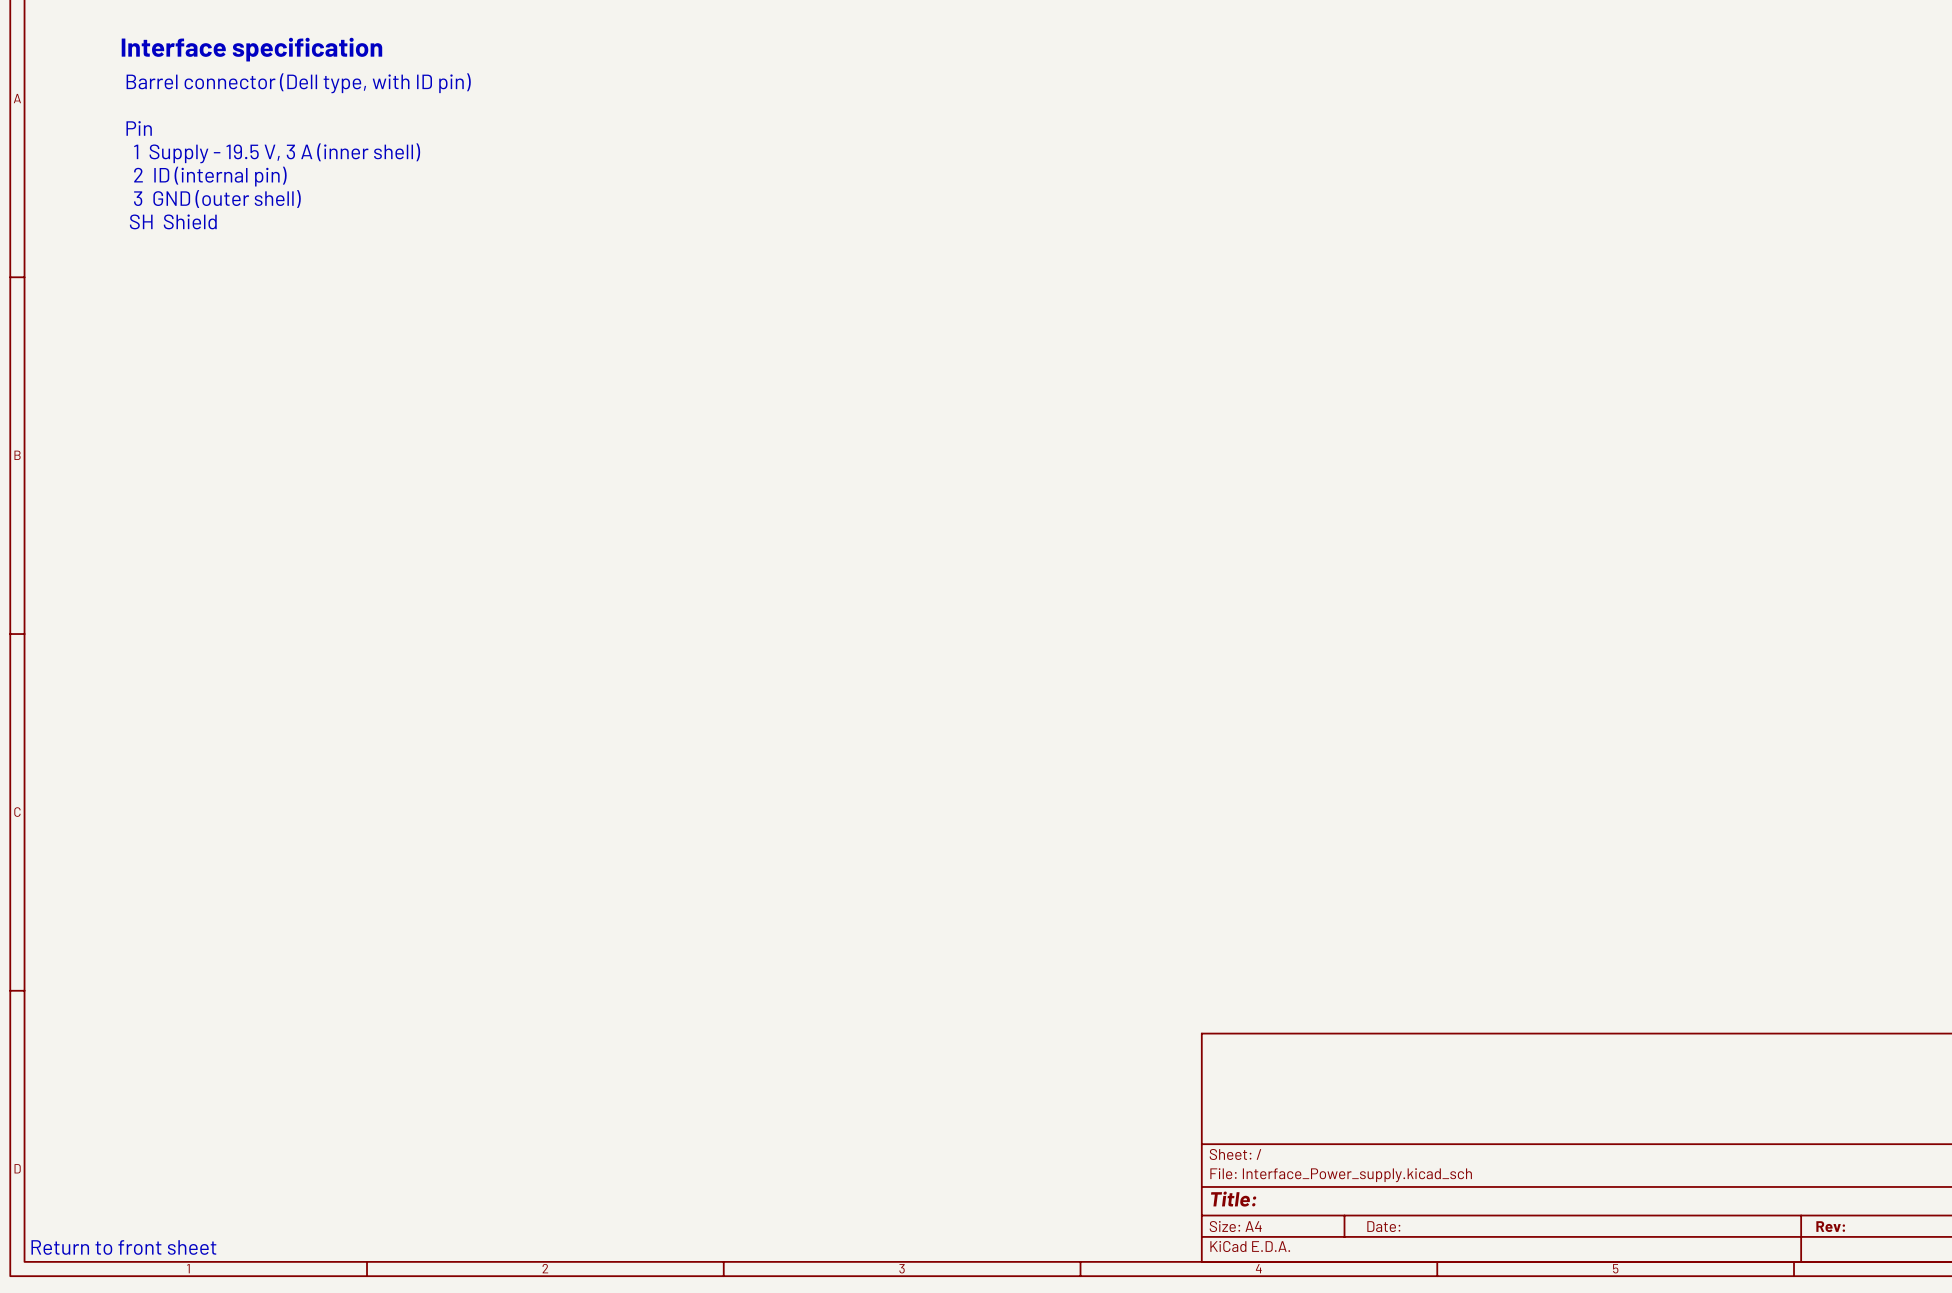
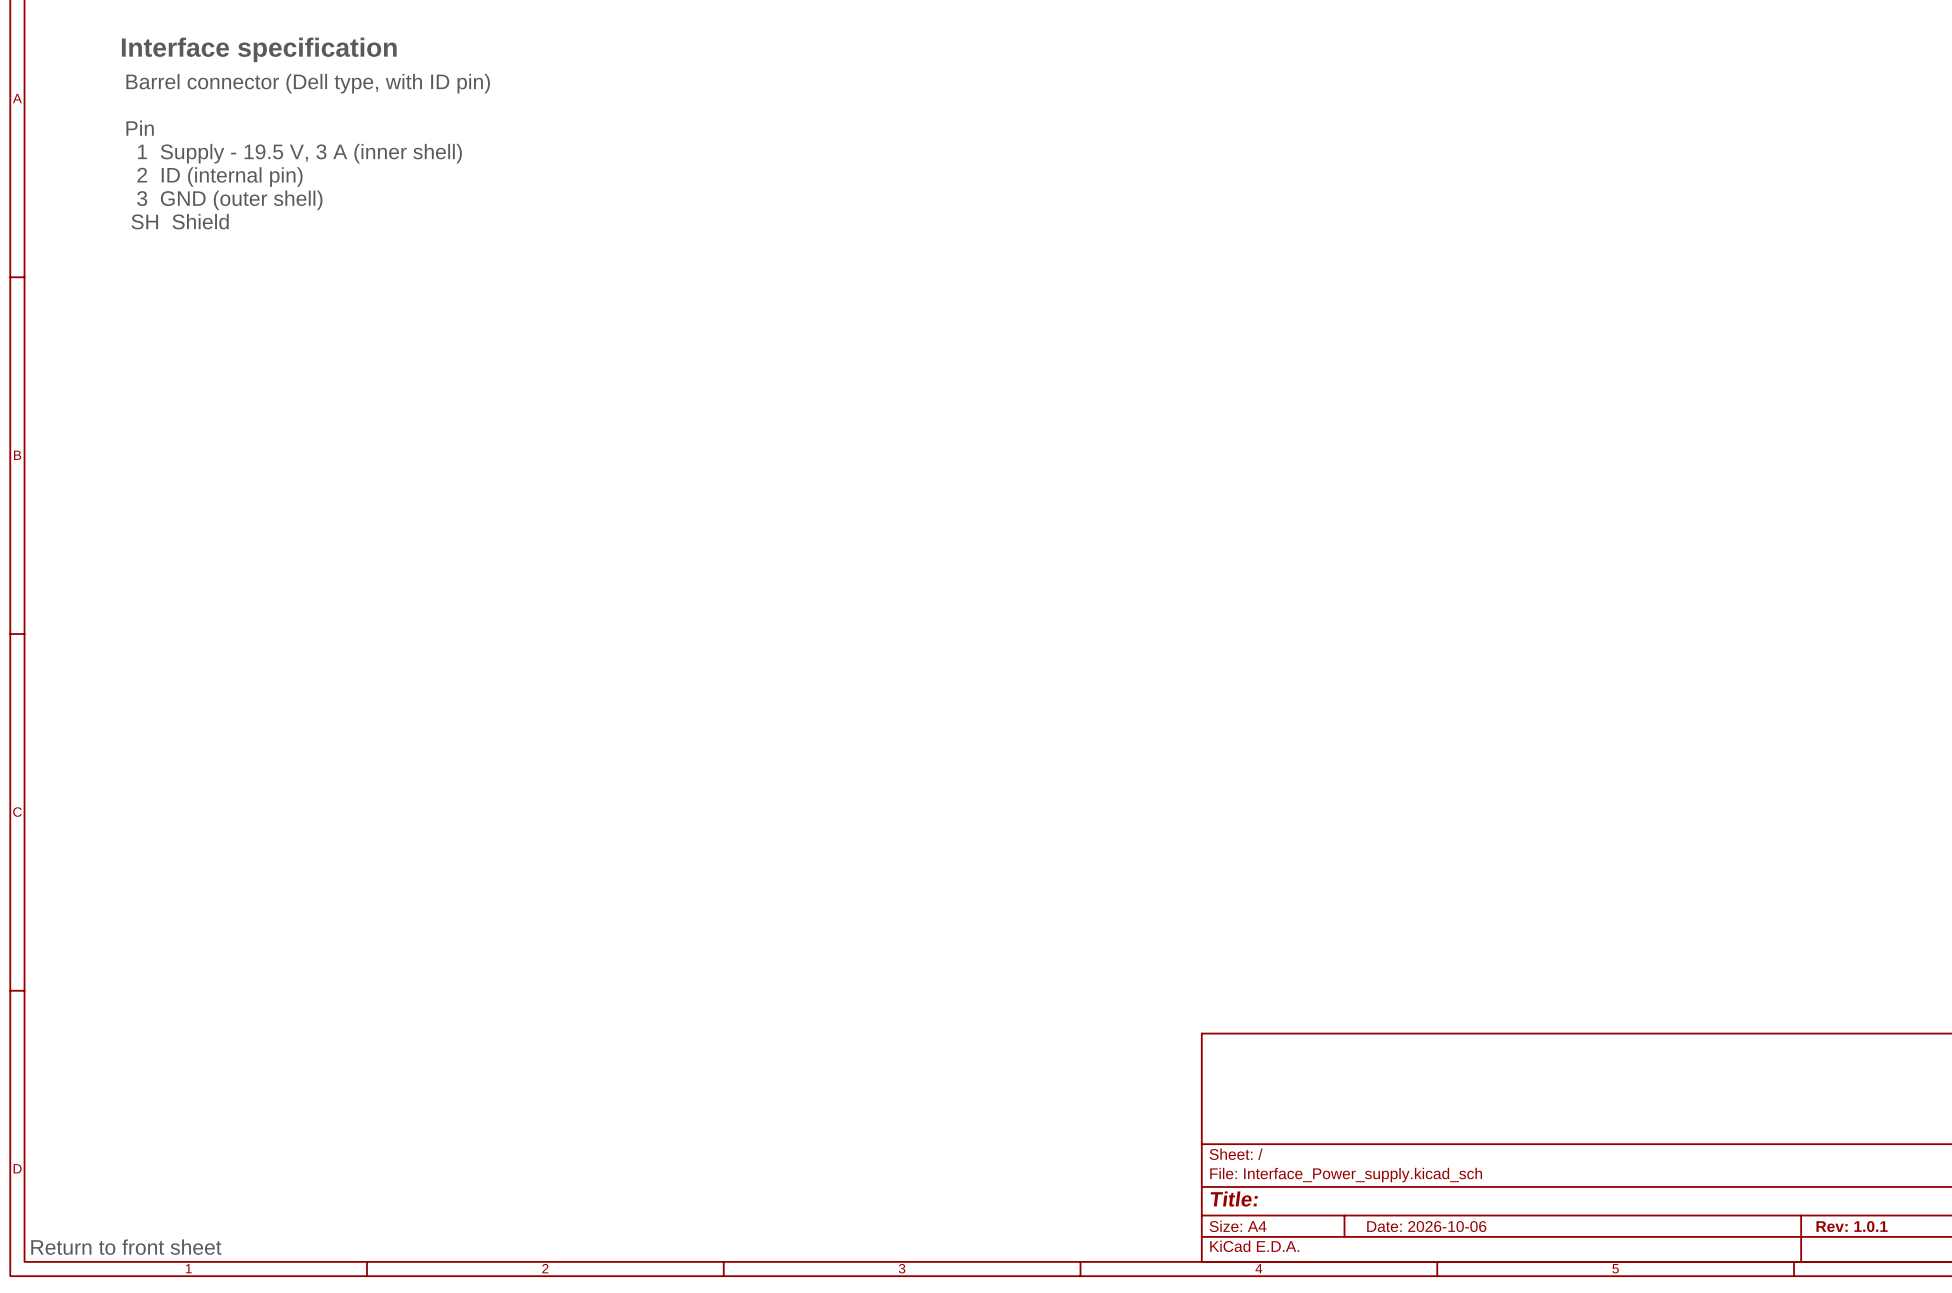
title block: Date: (1383, 1226) -> Date: 2026-10-06 (1426, 1226)
title block: Rev: (1830, 1226) -> Rev: 1.0.1 (1852, 1226)

